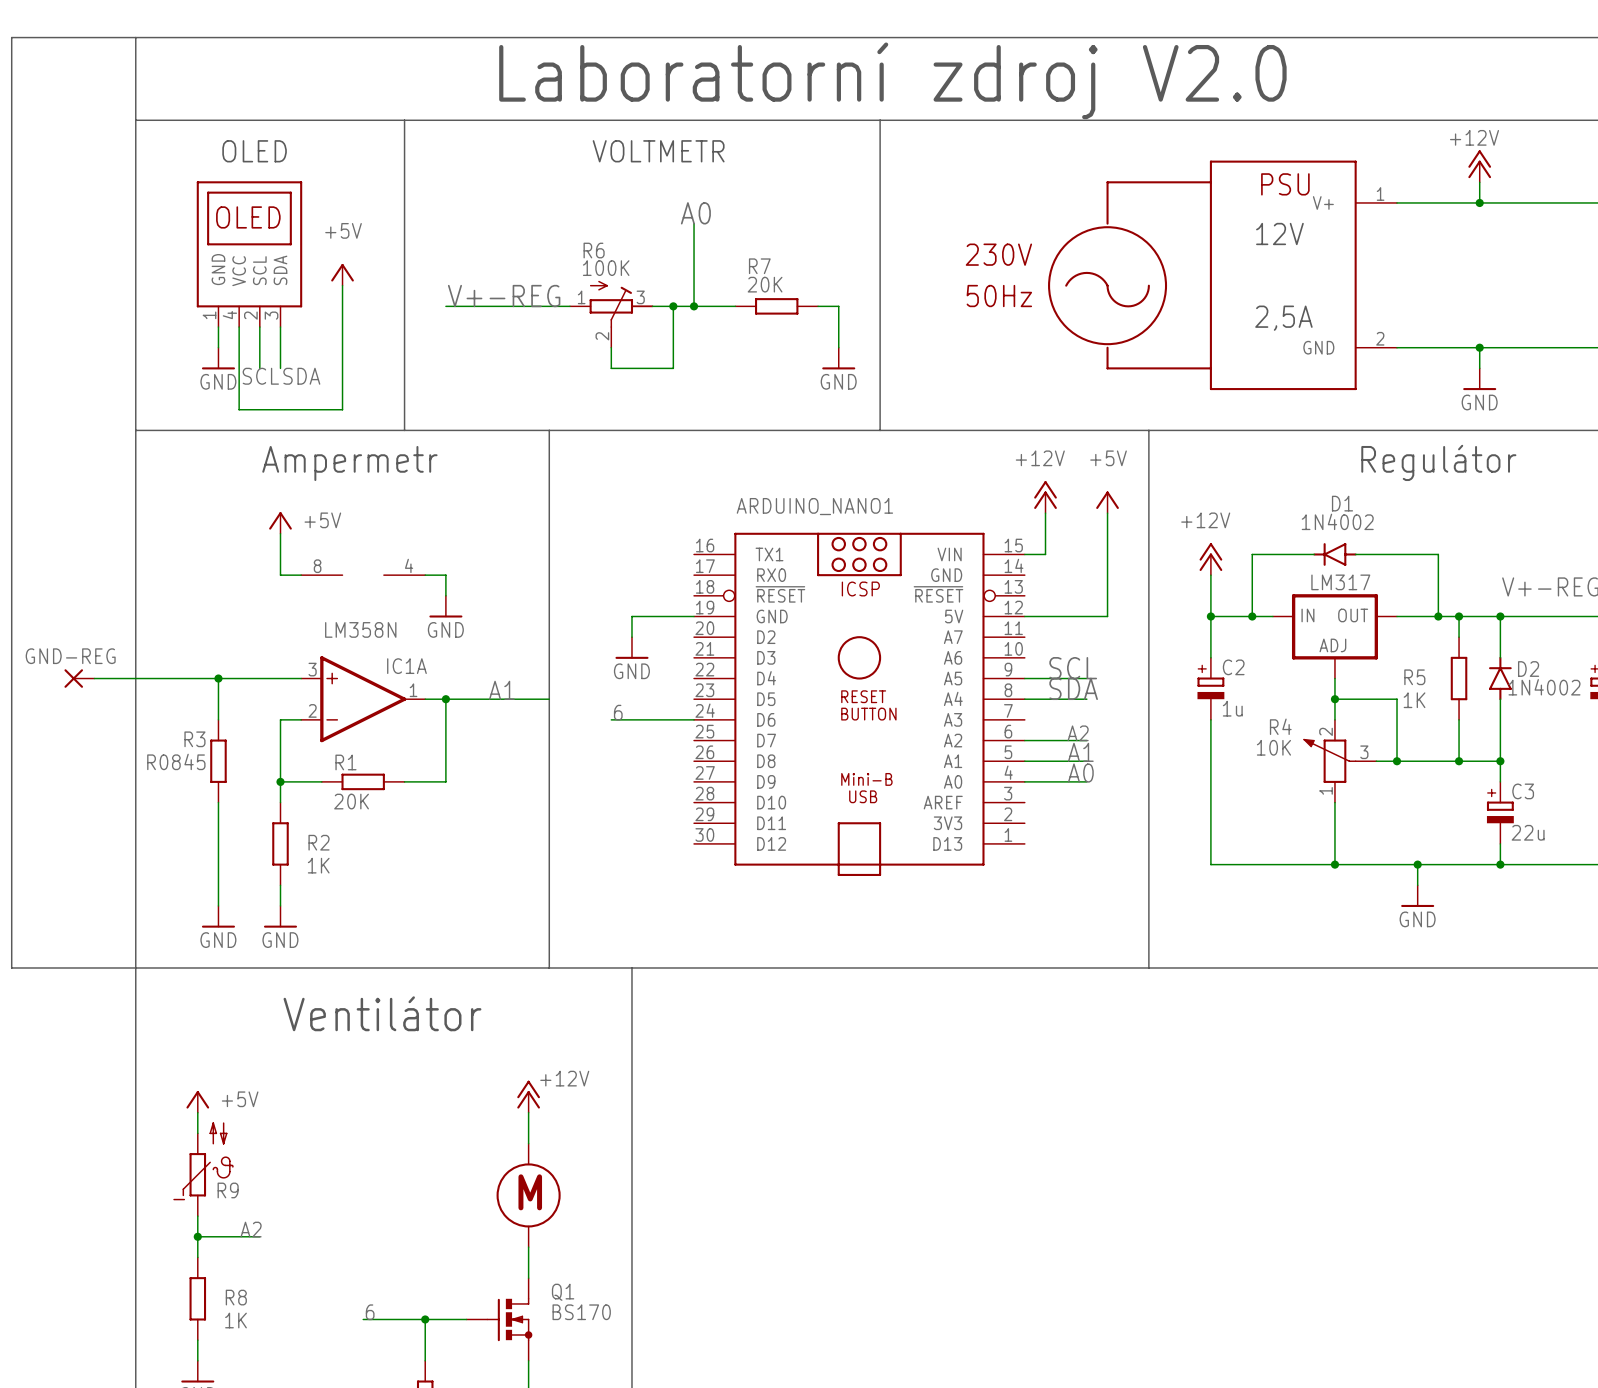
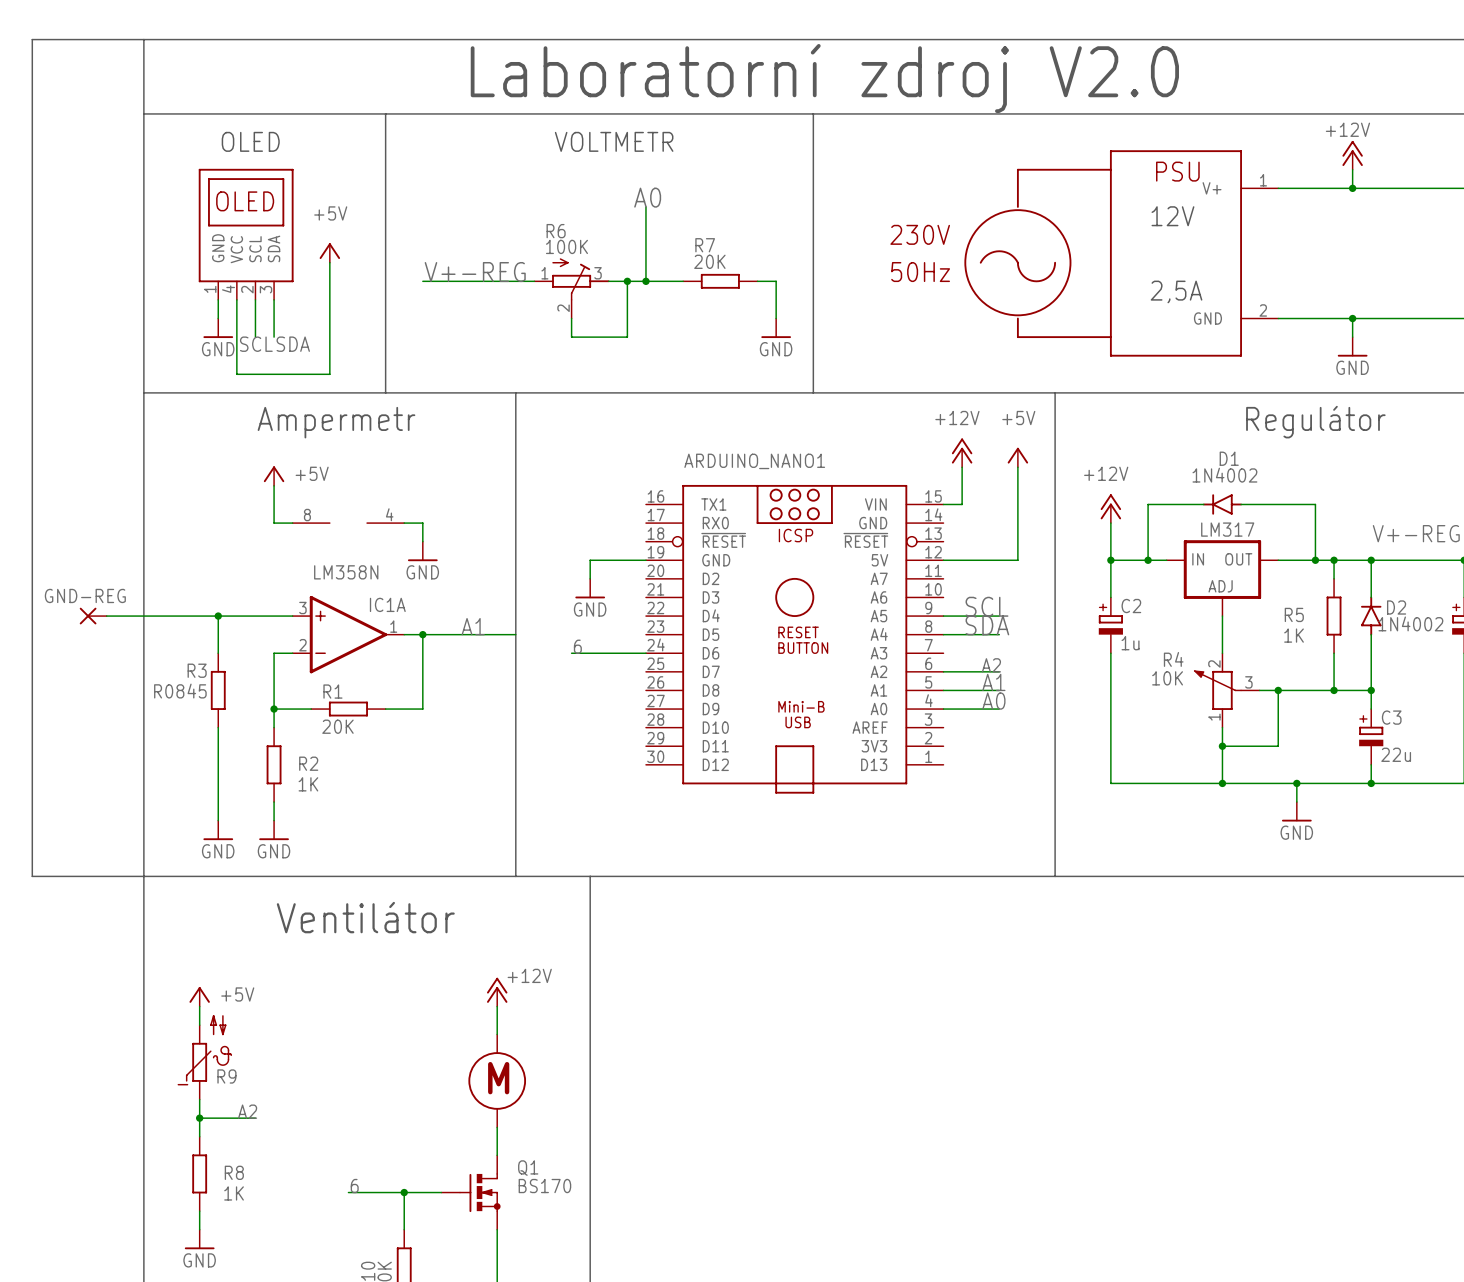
wire: (1334, 699) (1397, 699) (1397, 761) -> (1222, 746) (1278, 746) (1278, 690)
junction: (1334, 699) -> none
junction: none -> (1222, 746)

